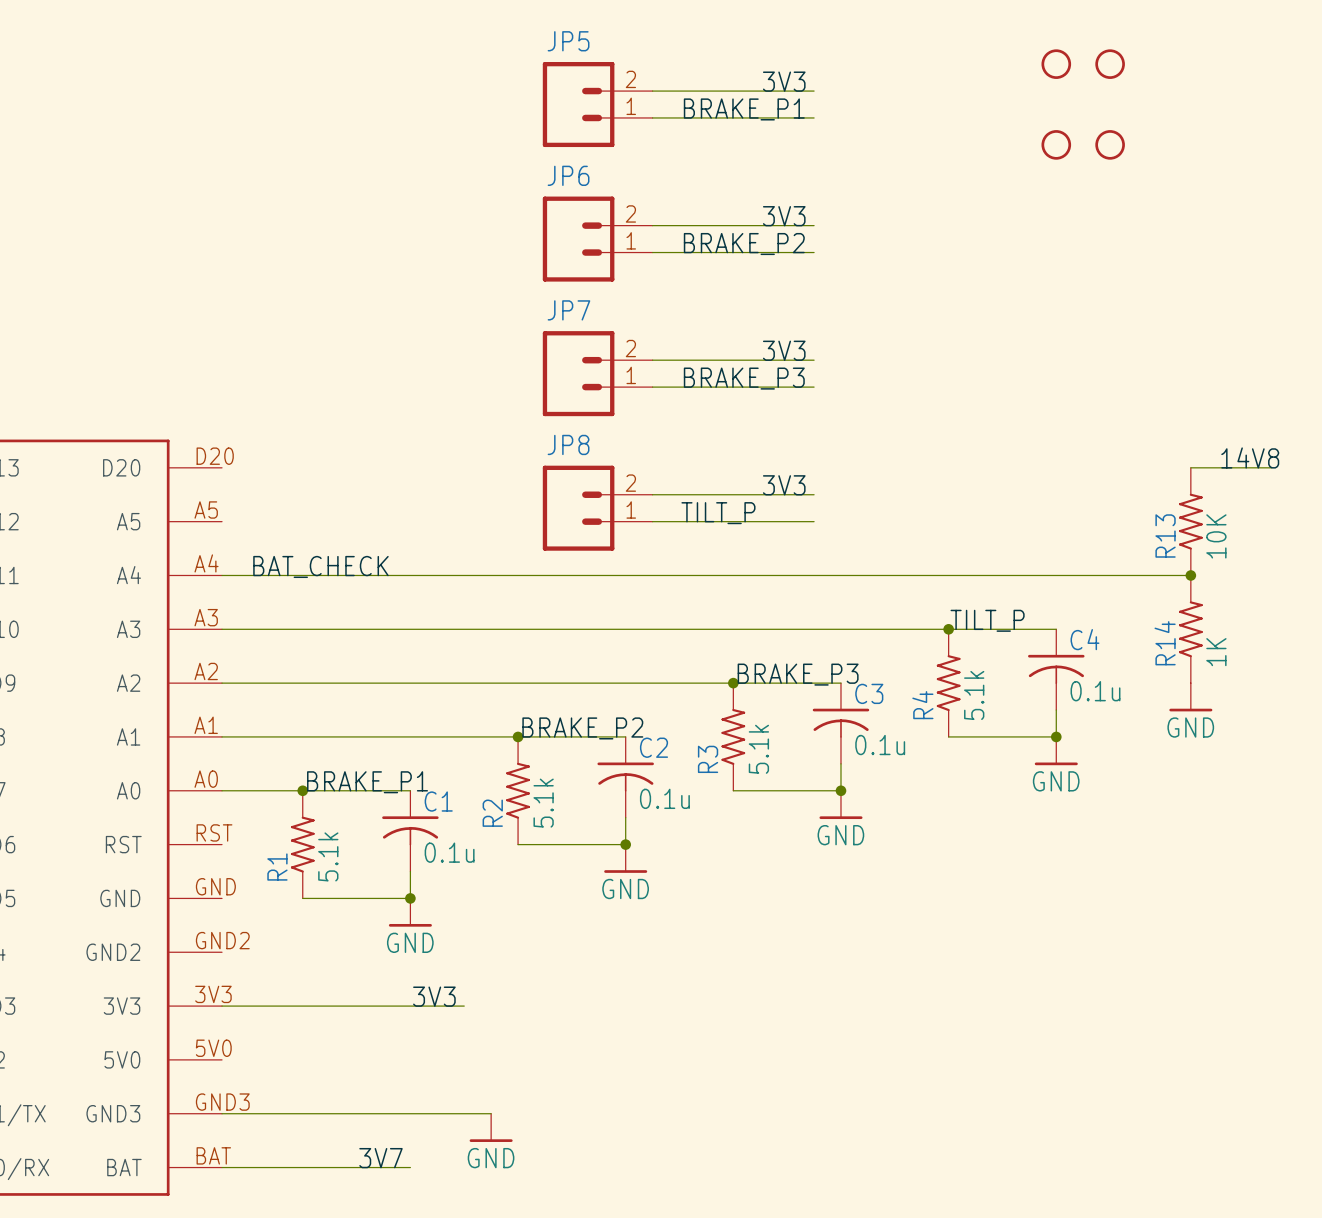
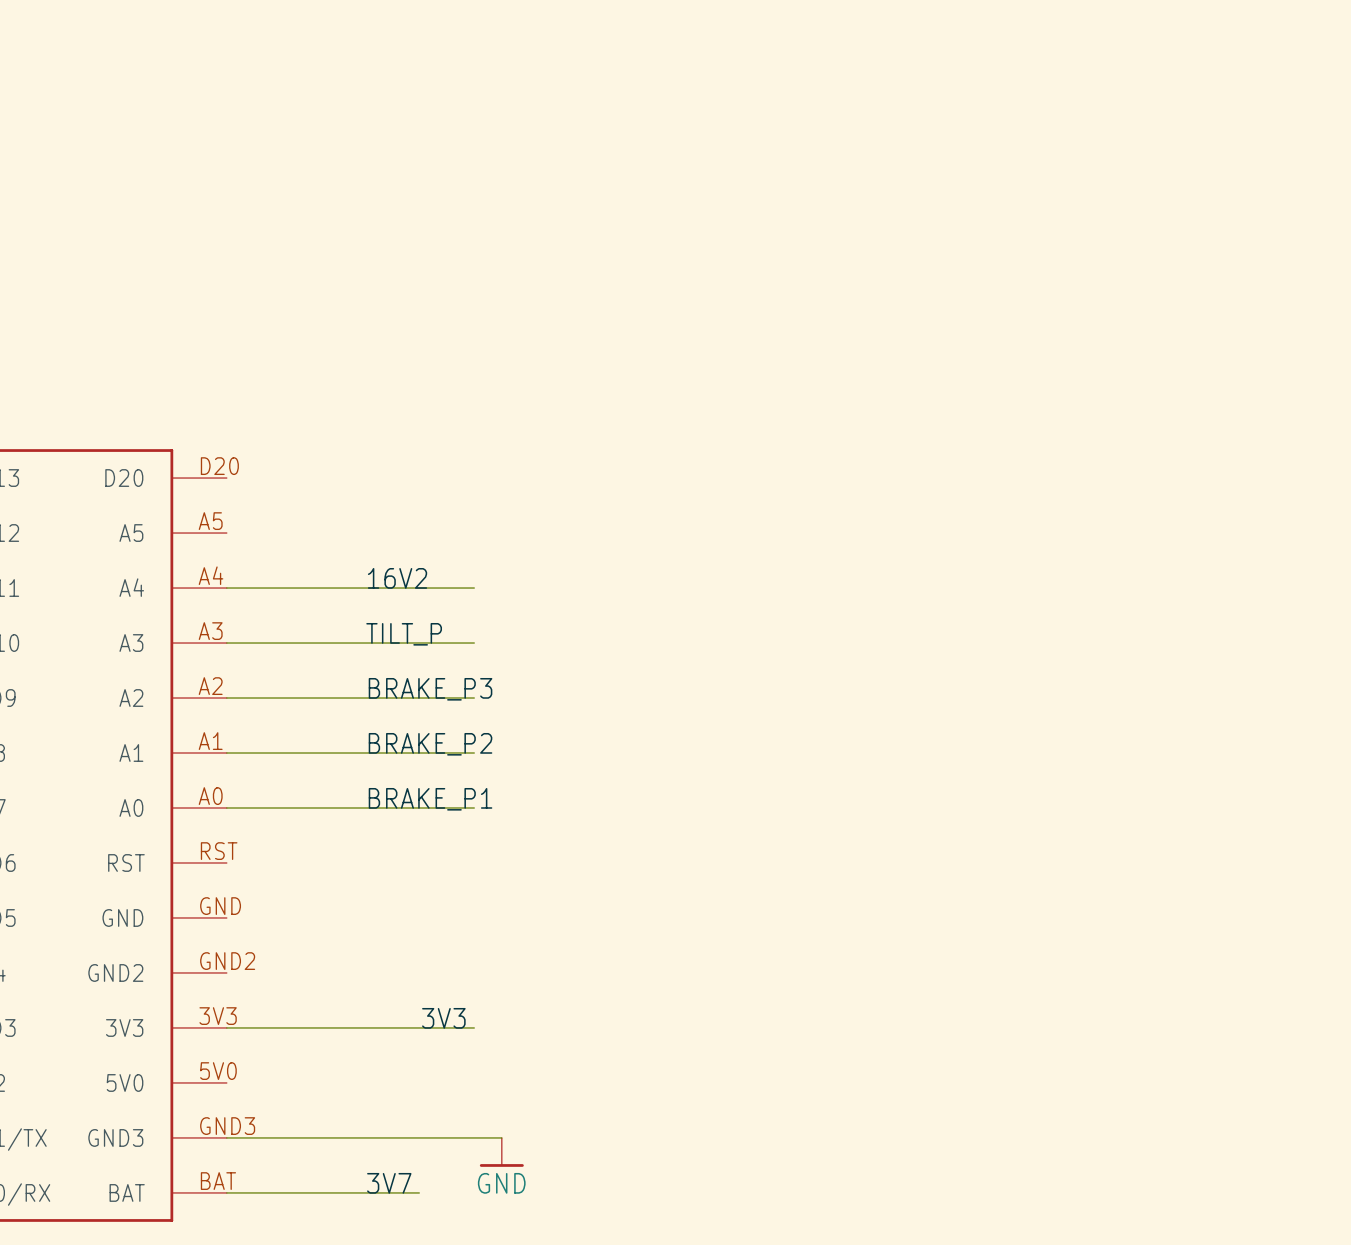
part: (1056, 64) -> none
part: (1110, 64) -> none
label: 3V3 (784, 81) -> none
wire: (652, 91) (814, 91) -> none
JP5: (597, 104) -> none
label: BRAKE_P1 (744, 109) -> none
wire: (652, 117) (814, 117) -> none
part: (1056, 144) -> none
part: (1110, 144) -> none
label: 3V3 (784, 216) -> none
wire: (652, 225) (814, 225) -> none
JP6: (597, 239) -> none
label: BRAKE_P2 (744, 244) -> none
wire: (652, 252) (814, 252) -> none
label: 3V3 (784, 350) -> none
wire: (652, 360) (814, 360) -> none
JP7: (597, 373) -> none
label: BRAKE_P3 (744, 378) -> none
wire: (652, 387) (814, 387) -> none
label: 14V8 (1250, 457) -> none
wire: (1190, 467) (1271, 467) -> none
label: 3V3 (784, 485) -> none
wire: (652, 494) (814, 494) -> none
JP8: (597, 508) -> none
label: TILT_P (718, 513) -> none
wire: (652, 521) (814, 521) -> none
R13: 10K (1190, 521) -> none
label: BAT_CHECK (320, 566) -> none
label: none -> 16V2 (397, 578)
wire: (464, 575) (1190, 575) -> none
junction: (1190, 575) -> none
label: none -> TILT_P (404, 634)
label: TILT_P (987, 620) -> none
wire: (464, 629) (1056, 629) -> none
junction: (948, 629) -> none
R14: 1K (1190, 629) -> none
C4: 0.1u (1056, 669) -> none
label: none -> BRAKE_P3 (430, 689)
label: BRAKE_P3 (798, 674) -> none
wire: (464, 683) (840, 683) -> none
junction: (733, 683) -> none
R4: 5.1k (948, 683) -> none
power symbol: GND (1190, 697) -> none
wire: (1056, 710) (1056, 736) (948, 736) -> none
C3: 0.1u (840, 723) -> none
label position: BRAKE_P2 (582, 728) -> BRAKE_P2 (430, 744)
wire: (464, 736) (625, 736) -> none
junction: (518, 736) -> none
R3: 5.1k (733, 736) -> none
junction: (1056, 736) -> none
power symbol: GND (1056, 751) -> none
wire: (840, 763) (840, 790) (733, 790) -> none
C2: 0.1u (625, 777) -> none
label position: BRAKE_P1 (367, 782) -> BRAKE_P1 (430, 799)
junction: (302, 790) -> none
wire: none -> (419, 807) (474, 807)
R2: 5.1k (518, 790) -> none
junction: (840, 790) -> none
power symbol: GND (840, 804) -> none
wire: (625, 817) (625, 844) (518, 844) -> none
C1: 0.1u (410, 831) -> none
R1: 5.1k (302, 844) -> none
junction: (625, 844) -> none
power symbol: GND (625, 858) -> none
wire: (410, 871) (410, 898) (302, 898) -> none
junction: (410, 898) -> none
power symbol: GND (410, 912) -> none

